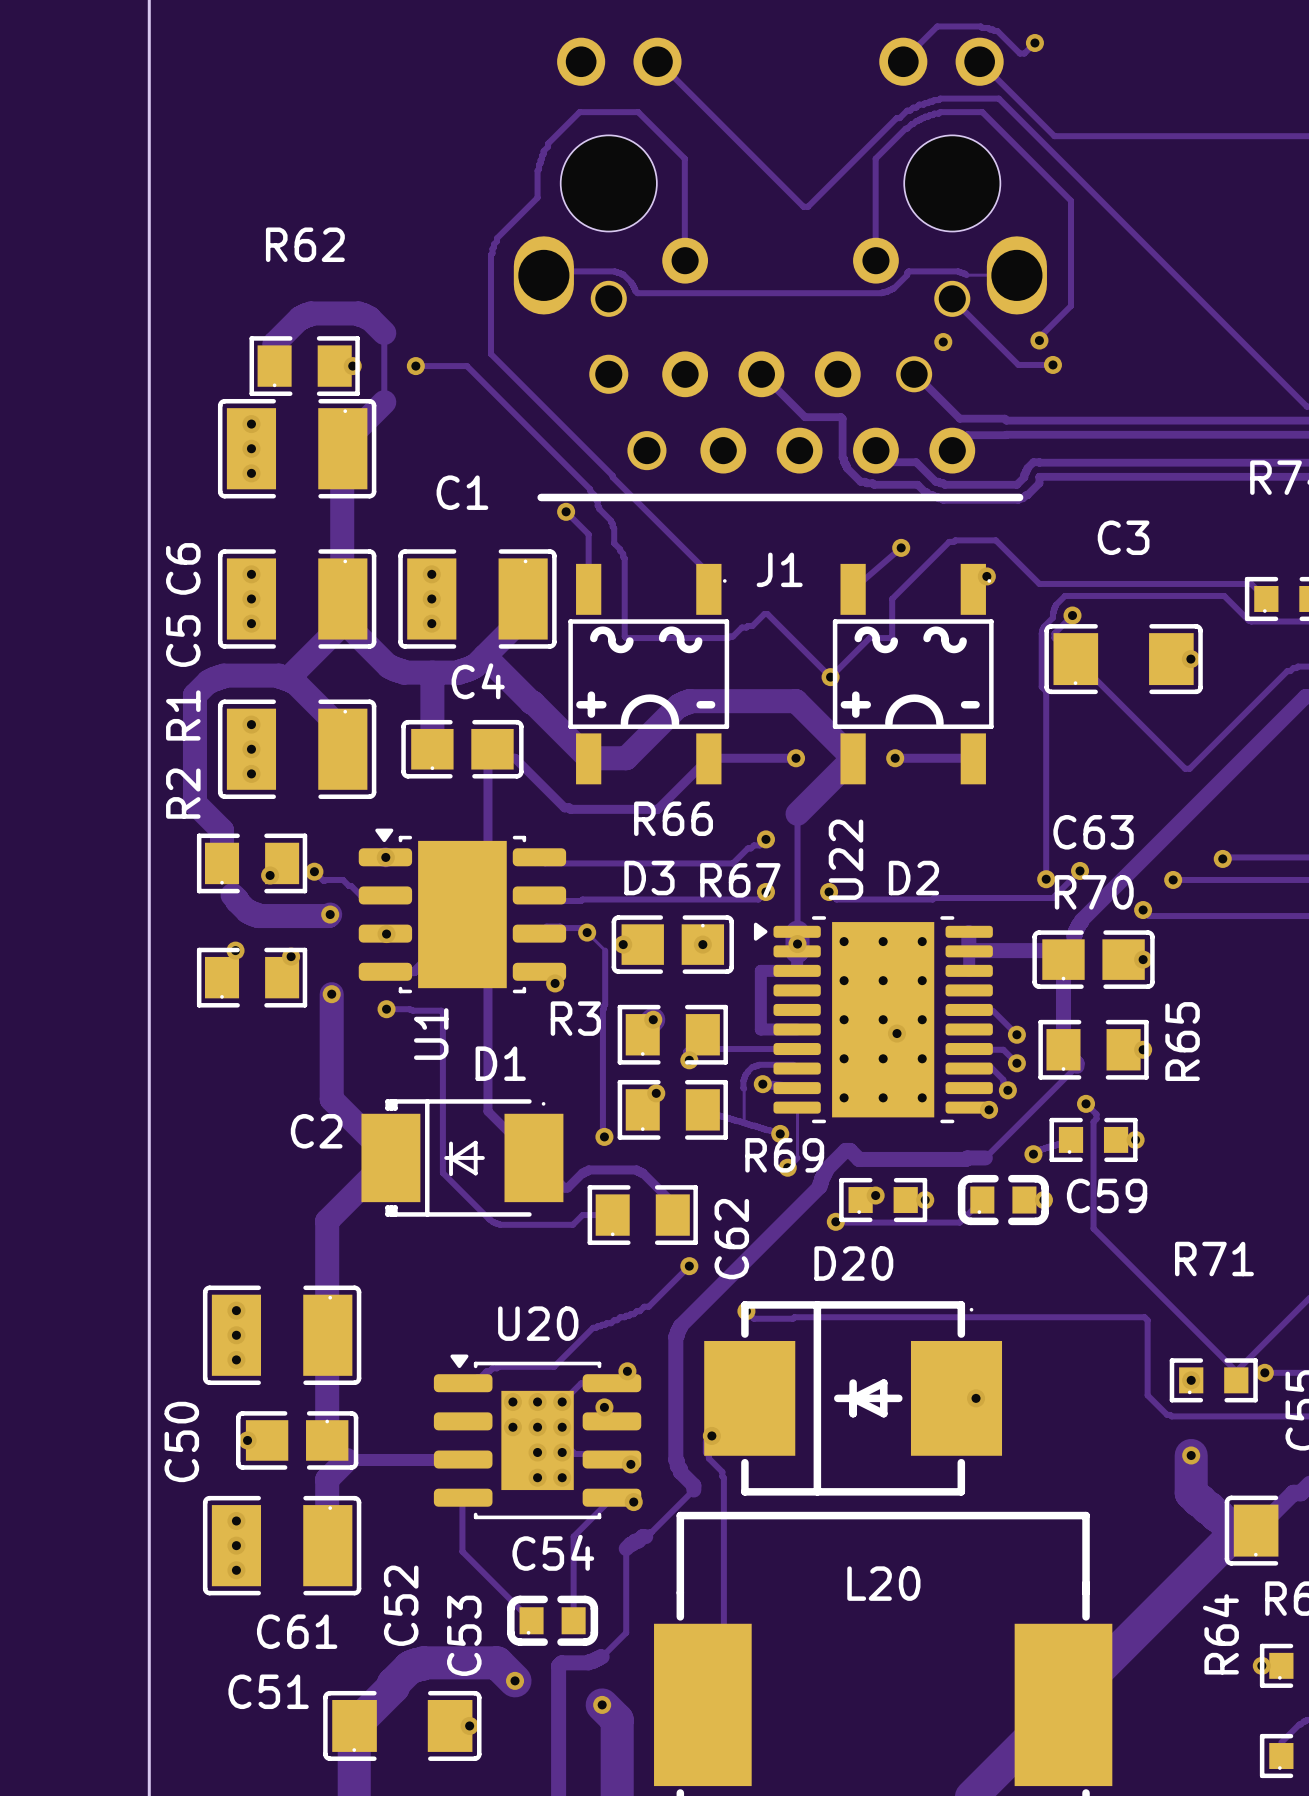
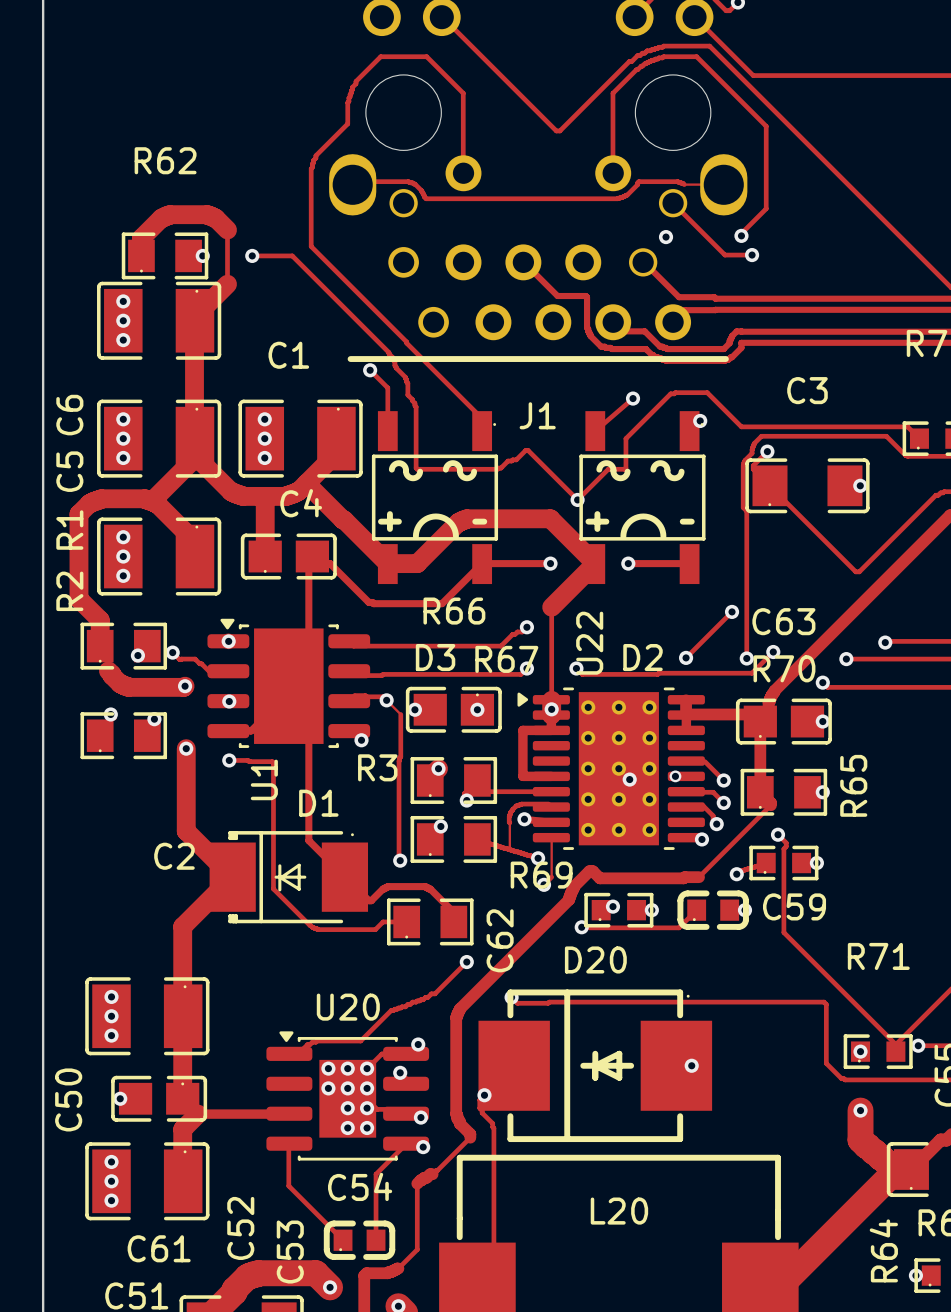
track: none -> (732, 611) (686, 657)
via: none -> (732, 611)
via: none -> (686, 657)
via: none -> (675, 776)

